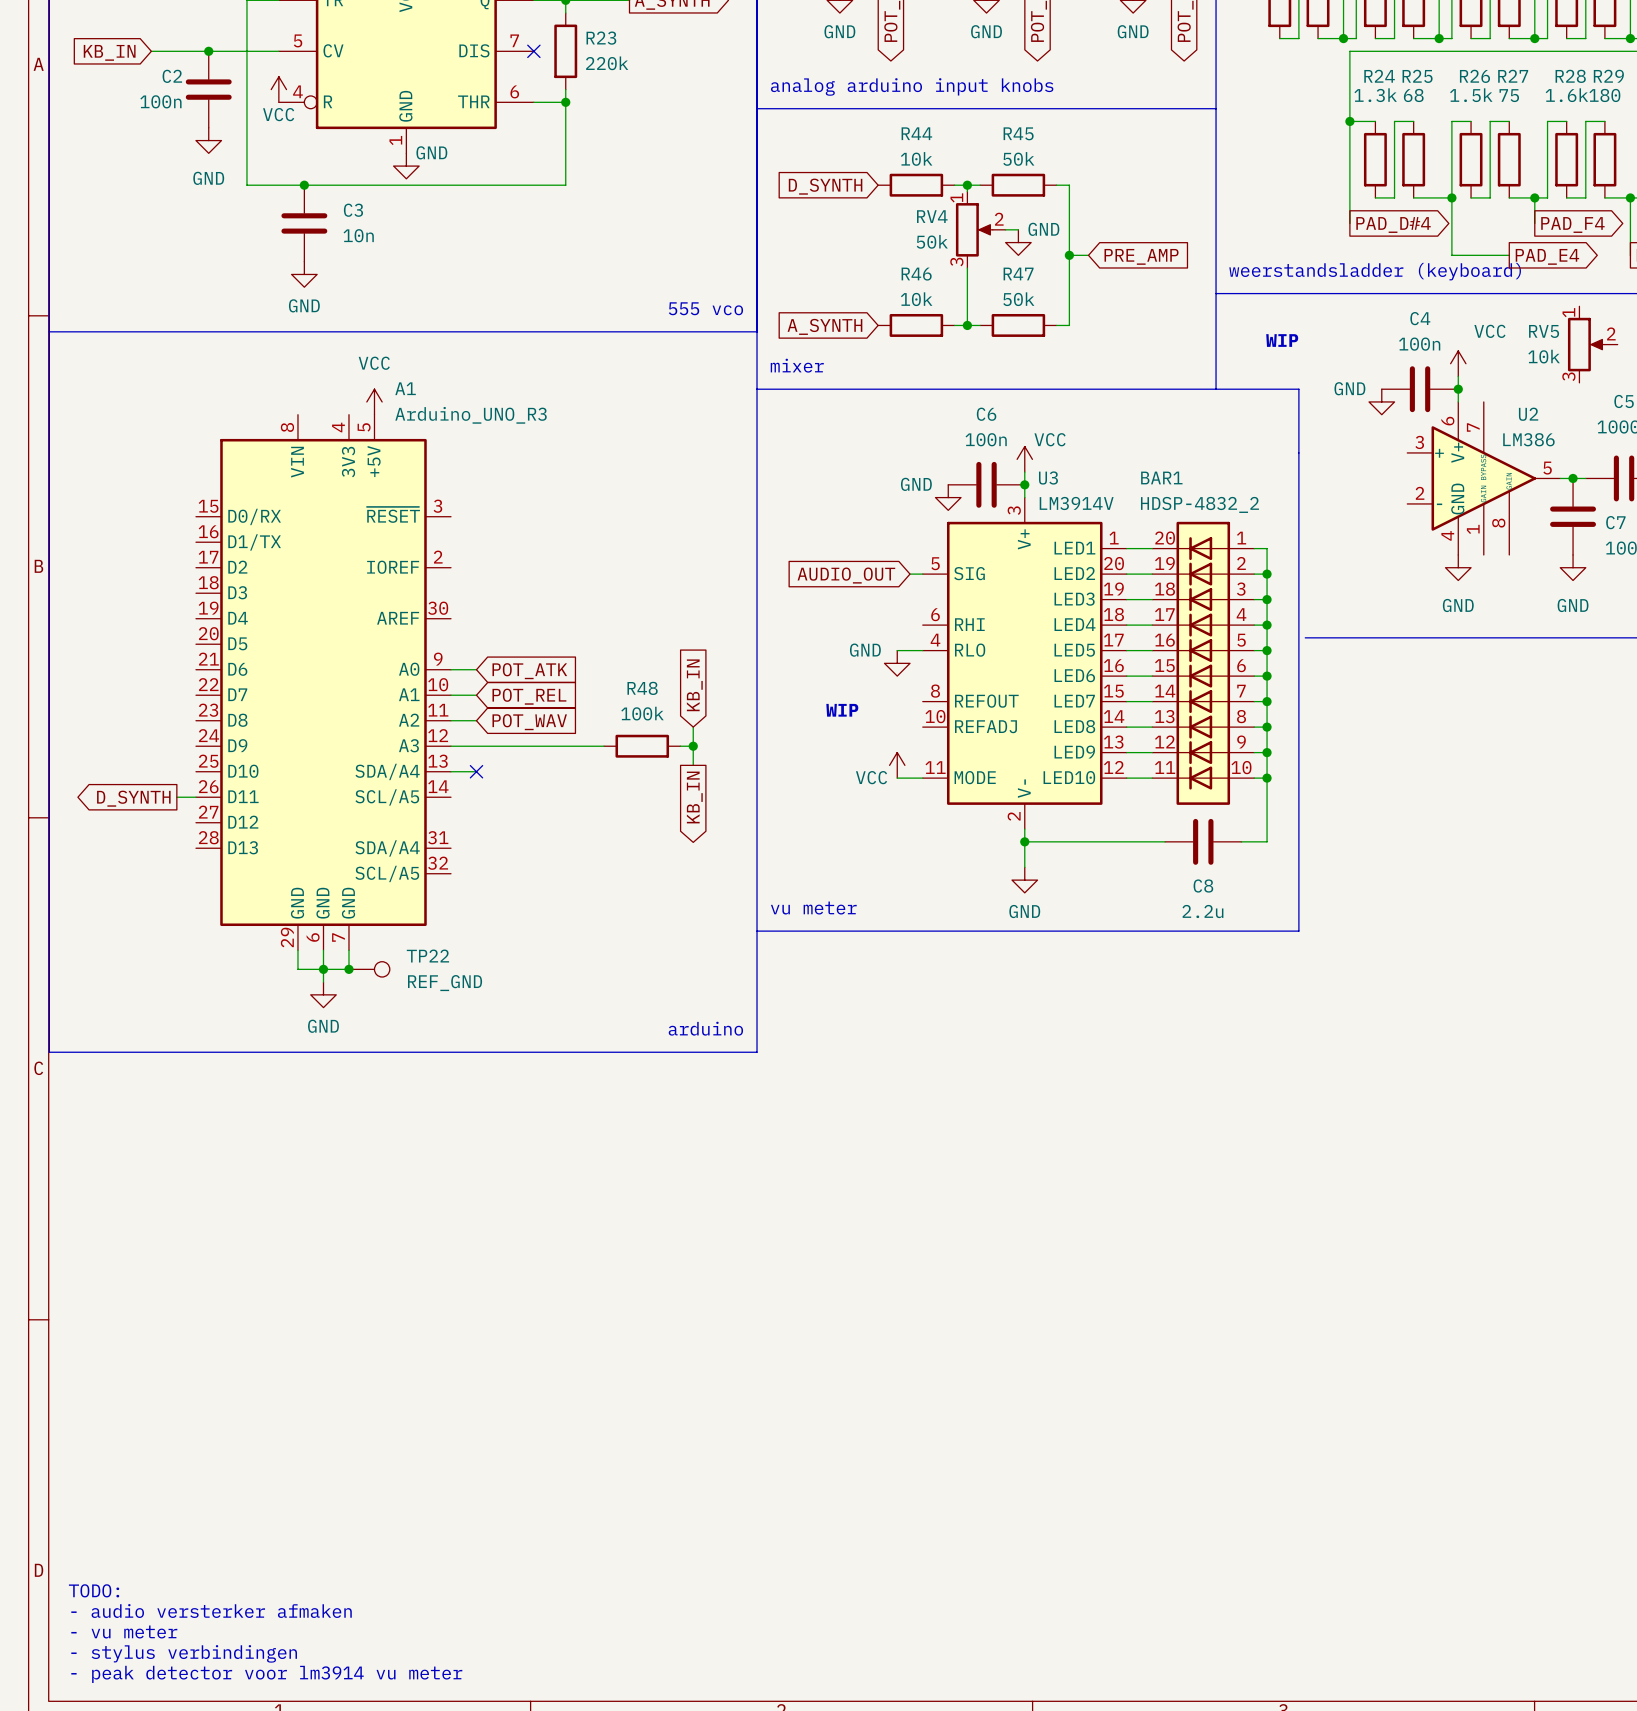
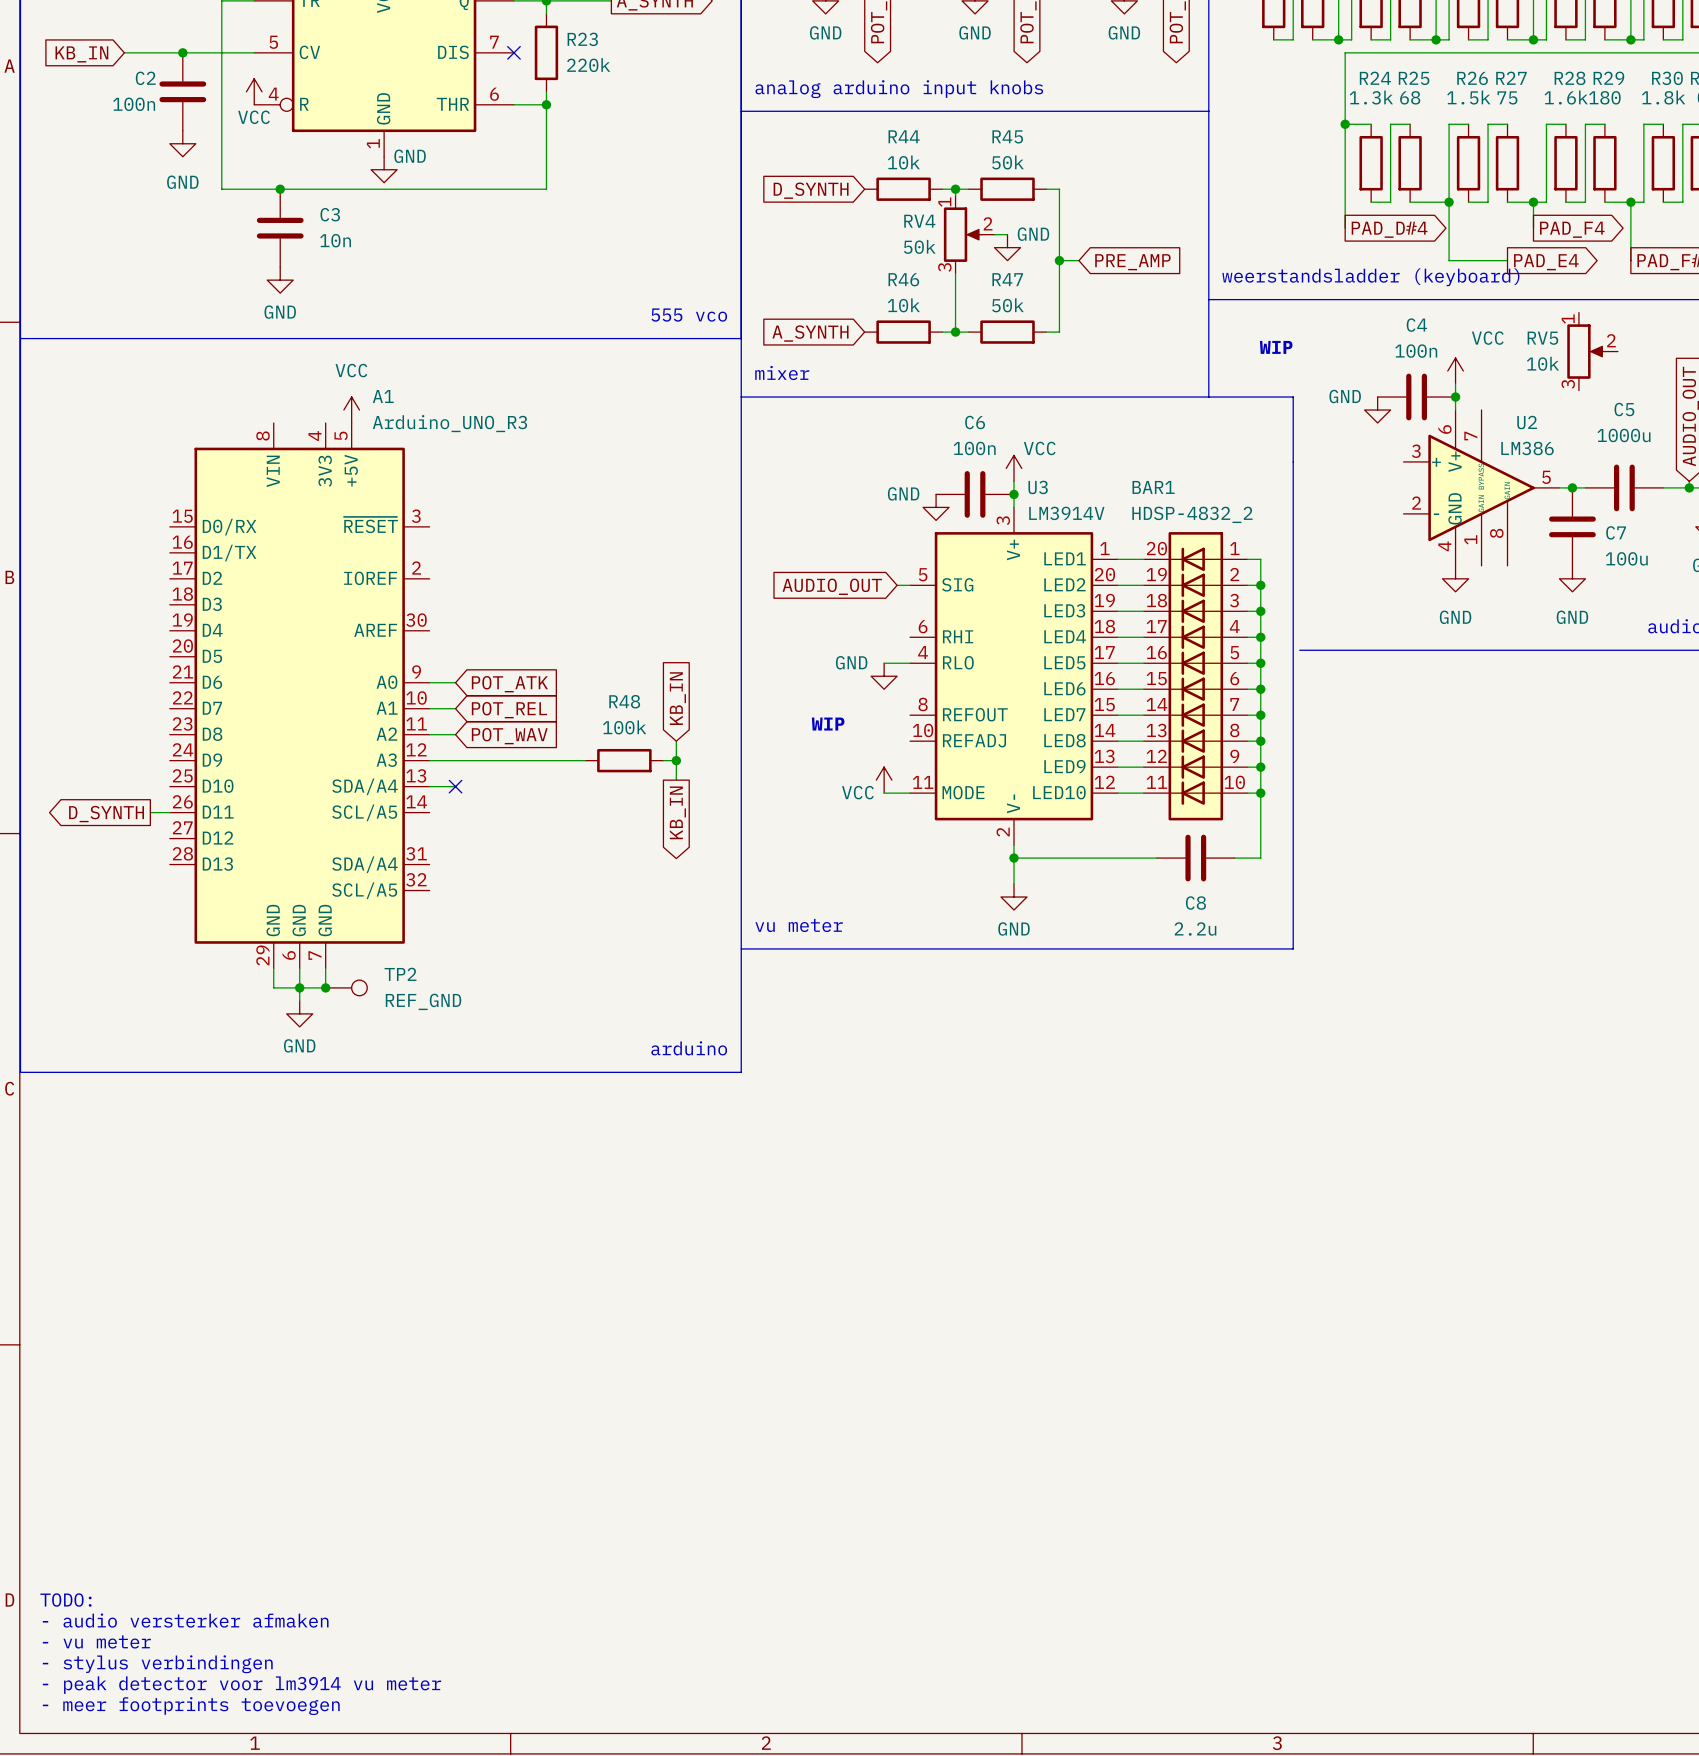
TP22 name: TP22 (427, 956) -> TP2 (400, 974)
text: none -> TODO: (66, 1600)
text: TODO: (94, 1590) -> - audio versterker afmaken (185, 1620)
text: - audio versterker afmaken (211, 1611) -> - vu meter (96, 1641)
text: - vu meter (124, 1632) -> - stylus verbindingen (157, 1664)
text: - stylus verbindingen (184, 1653) -> - peak detector voor lm3914 vu meter (241, 1685)
text: - peak detector voor lm3914 vu meter (266, 1674) -> - meer footprints toevoegen (191, 1706)

